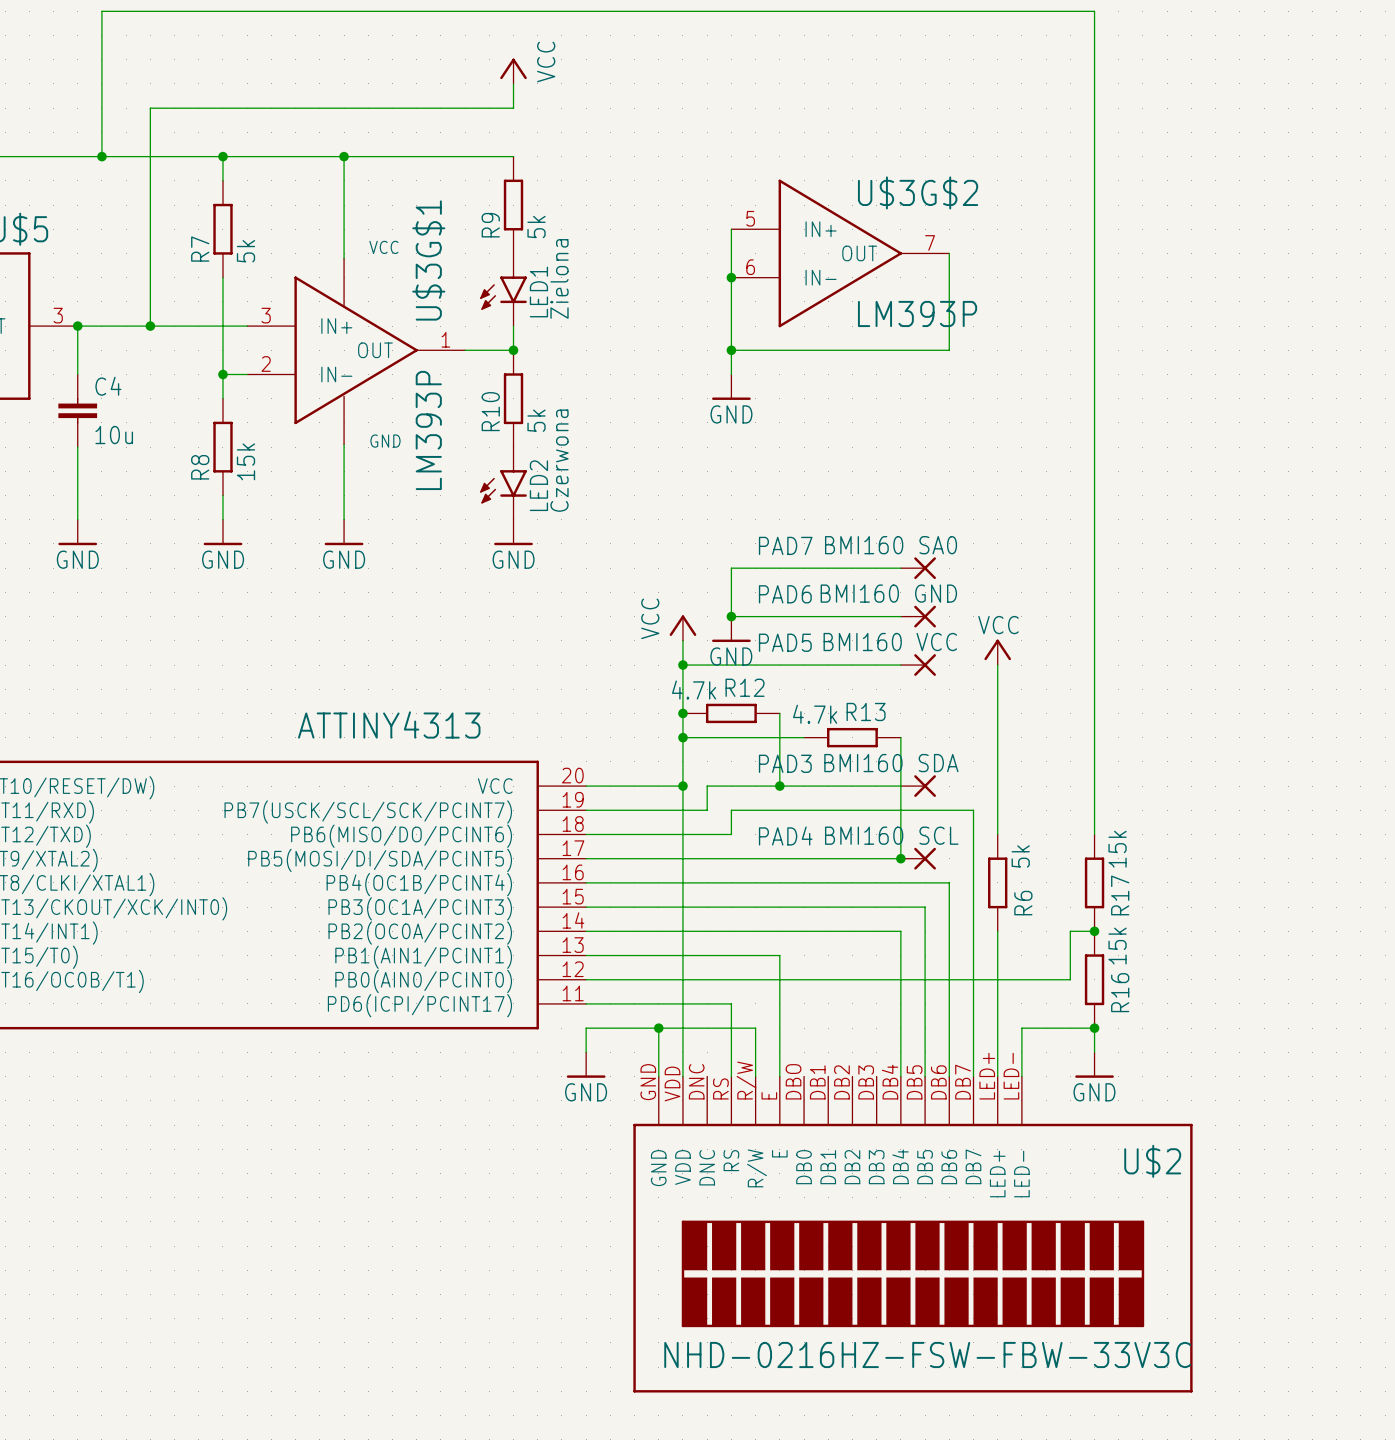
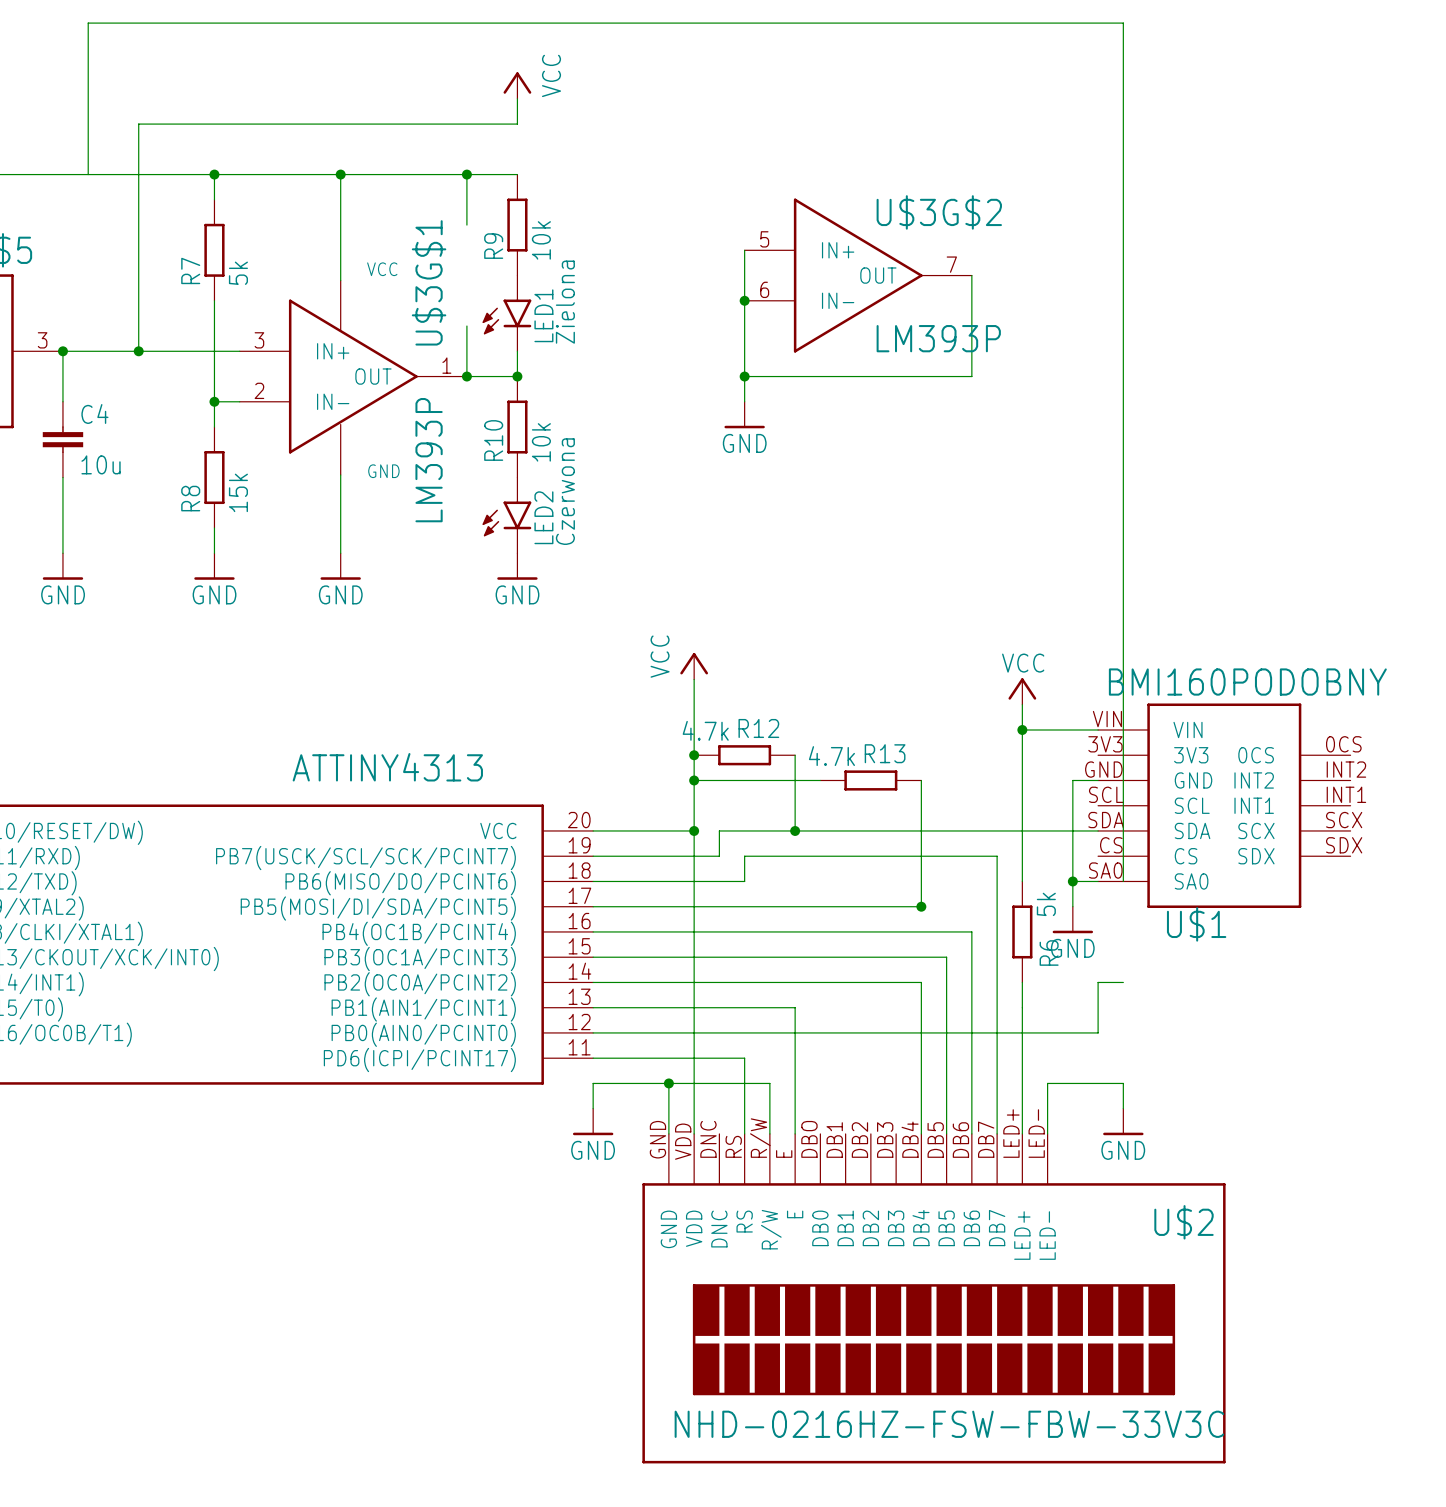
junction: (101, 156) -> none
wire: none -> (466, 174) (466, 225)
junction: none -> (466, 174)
R9 value: 5k (536, 227) -> 10k (541, 240)
wire: none -> (466, 326) (466, 376)
junction: none -> (466, 376)
R10 value: 5k (536, 420) -> 10k (541, 442)
wire: (900, 568) (731, 568) (731, 616) (900, 616) -> none
PAD7: BMI160 SA0 (918, 568) -> none
junction: (731, 616) -> none
PAD6: BMI160 GND (918, 616) -> none
power symbol: GND (731, 629) -> none
wire: (682, 665) (900, 665) -> none
junction: (682, 665) -> none
PAD5: BMI160 VCC (918, 665) -> none
wire: none -> (1022, 729) (1098, 729)
junction: none -> (1022, 729)
wire: none -> (1098, 780) (1072, 780) (1072, 906)
U$1: none -> BMI160PODOBNY (1224, 805)
wire: none -> (921, 830) (1098, 830)
PAD3: BMI160 SDA (918, 786) -> none
wire: none -> (1072, 881) (1098, 881)
junction: none -> (1072, 881)
PAD4: BMI160 SCL (918, 858) -> none
power symbol: none -> GND (1072, 919)
R17: 15k (1094, 882) -> none
junction: (1094, 931) -> none
R16: 15k (1094, 979) -> none
junction: (1094, 1028) -> none

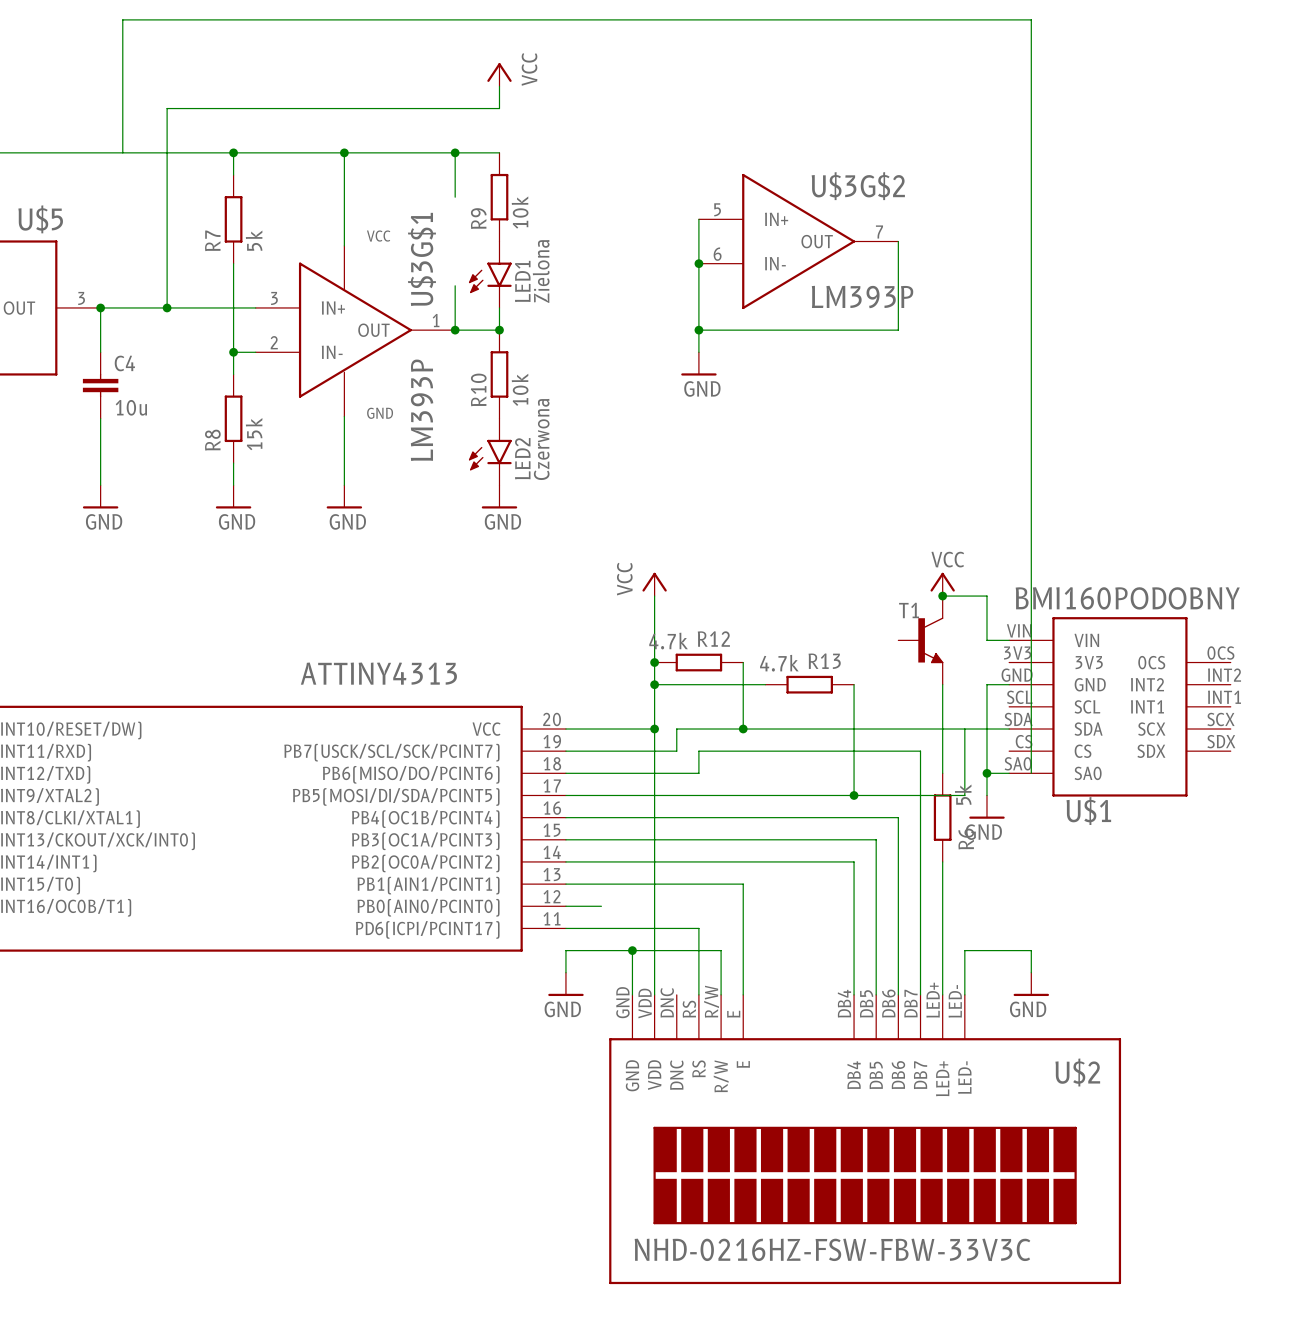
power symbol position: VCC (1022, 691) -> VCC (942, 584)
wire: (1022, 704) (1022, 780) -> none
T1: none -> (920, 640)
wire: (1022, 729) (1072, 729) -> (942, 596) (986, 596) (986, 640)
junction position: (1022, 729) -> (942, 596)
wire: none -> (964, 729) (964, 795) (854, 795)
wire: (1123, 982) (1098, 982) (1098, 1032) (633, 1032) -> none
U$2 symbol: [642, 1133, 1226, 1464] -> [609, 994, 1122, 1285]

